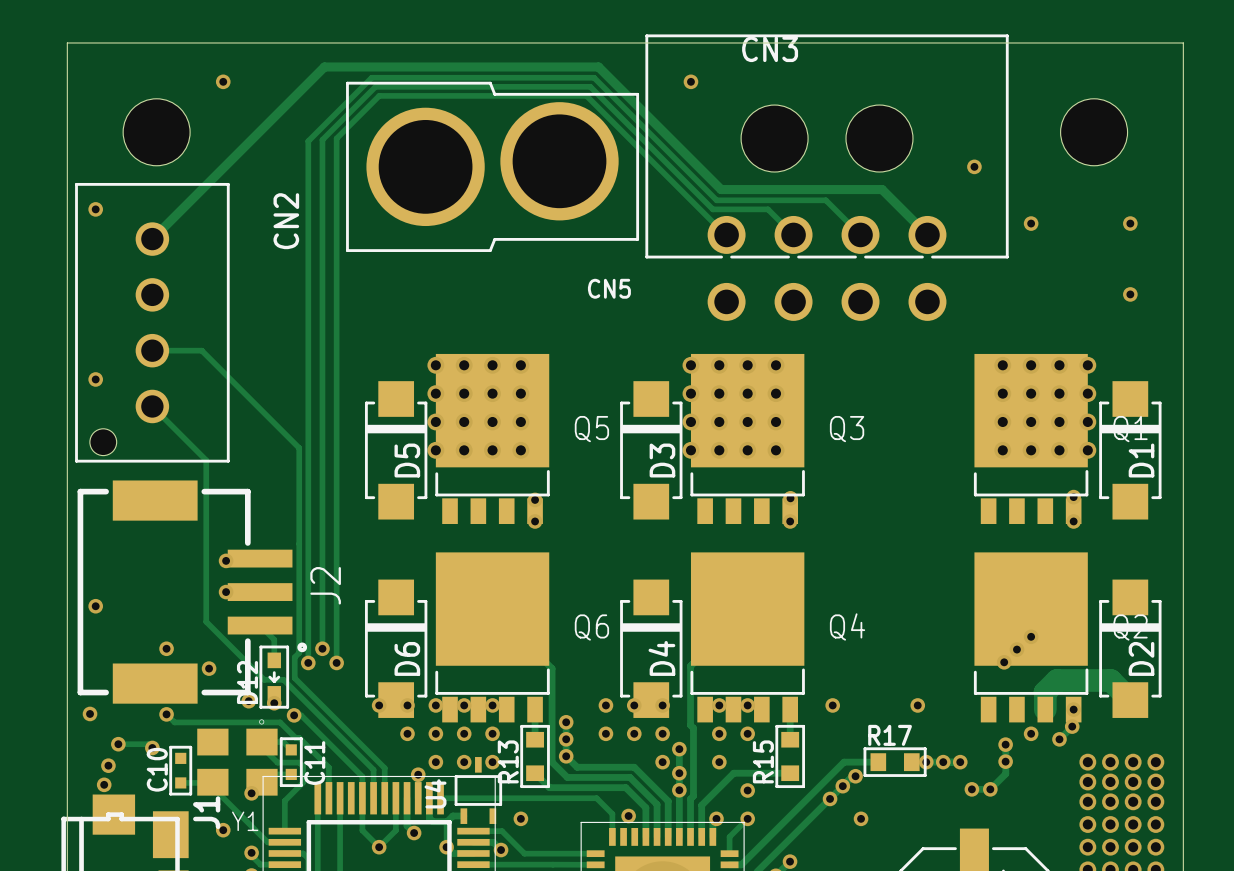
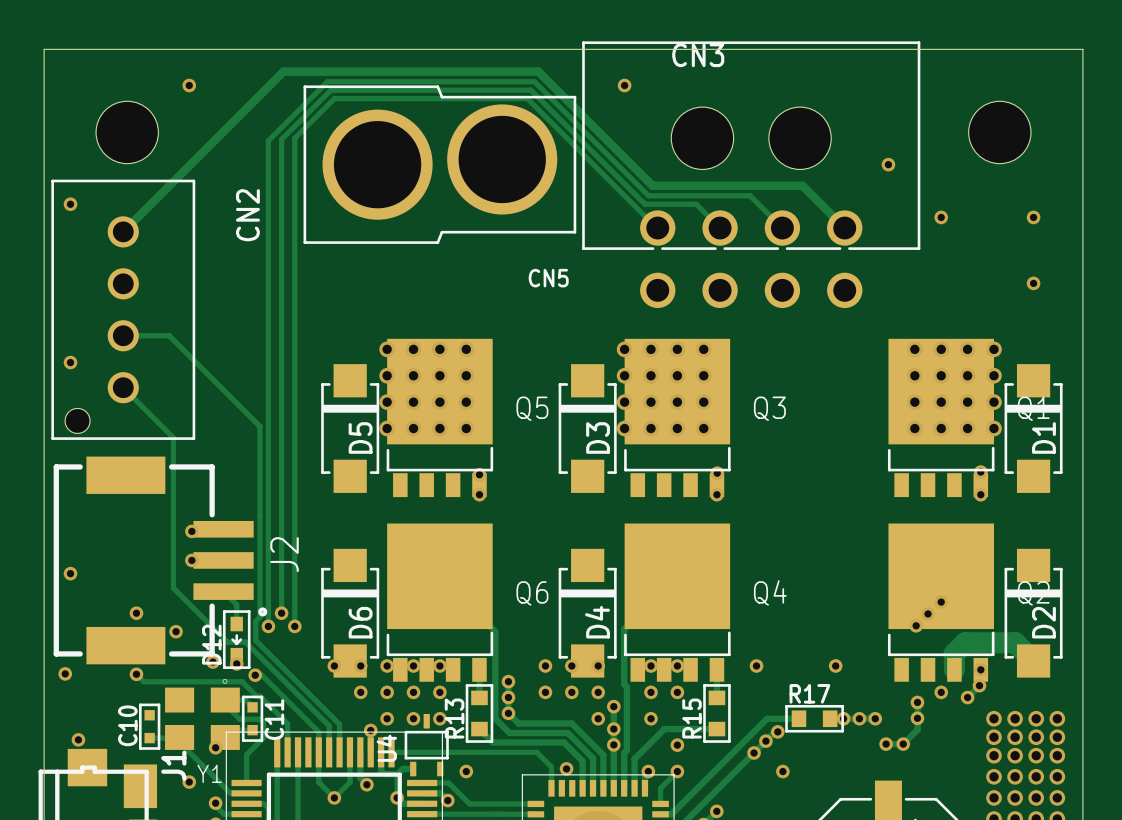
track: (118, 744) (148, 744) (152, 747) -> none
via: (118, 744) -> none
via: (152, 747) -> none
via: (108, 765) -> none

